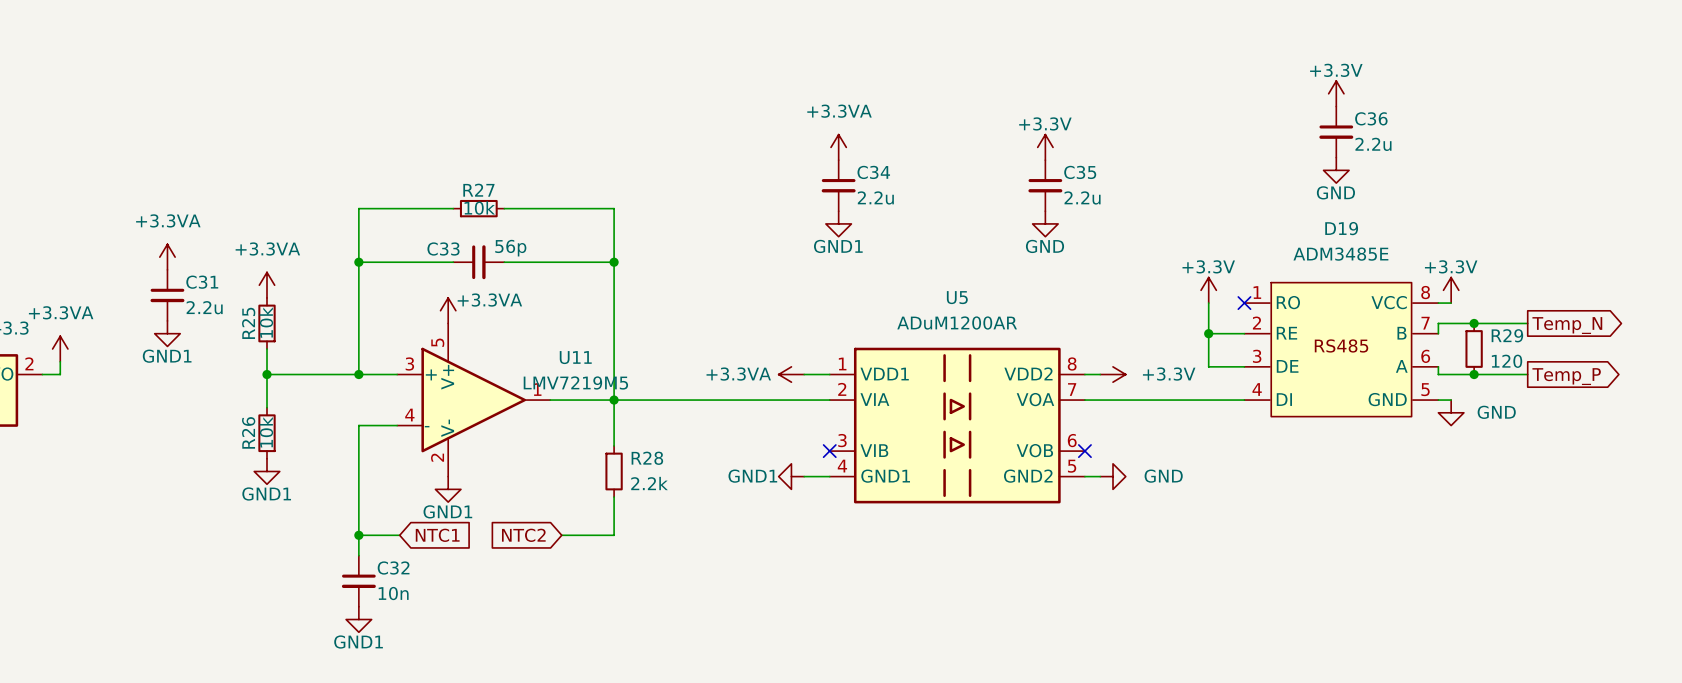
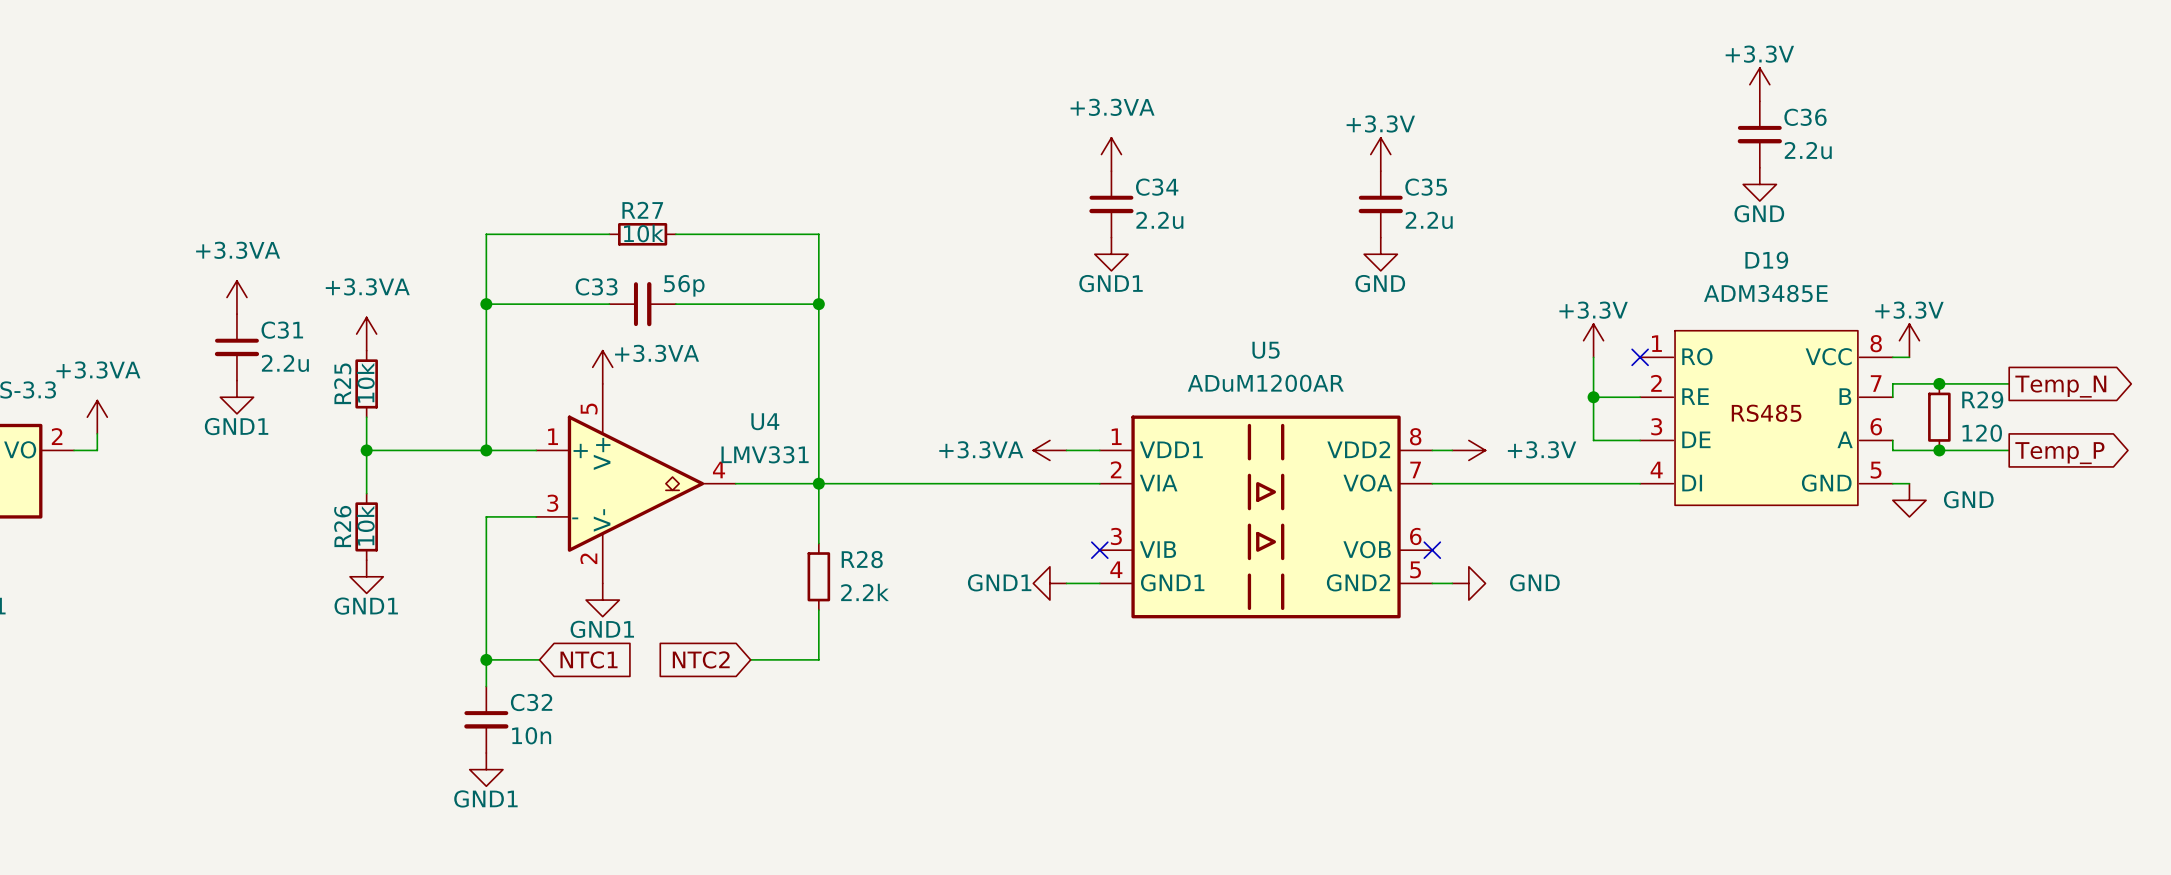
U11: LMV7219M5 (473, 400) -> none
U4: none -> LMV331 (635, 483)

